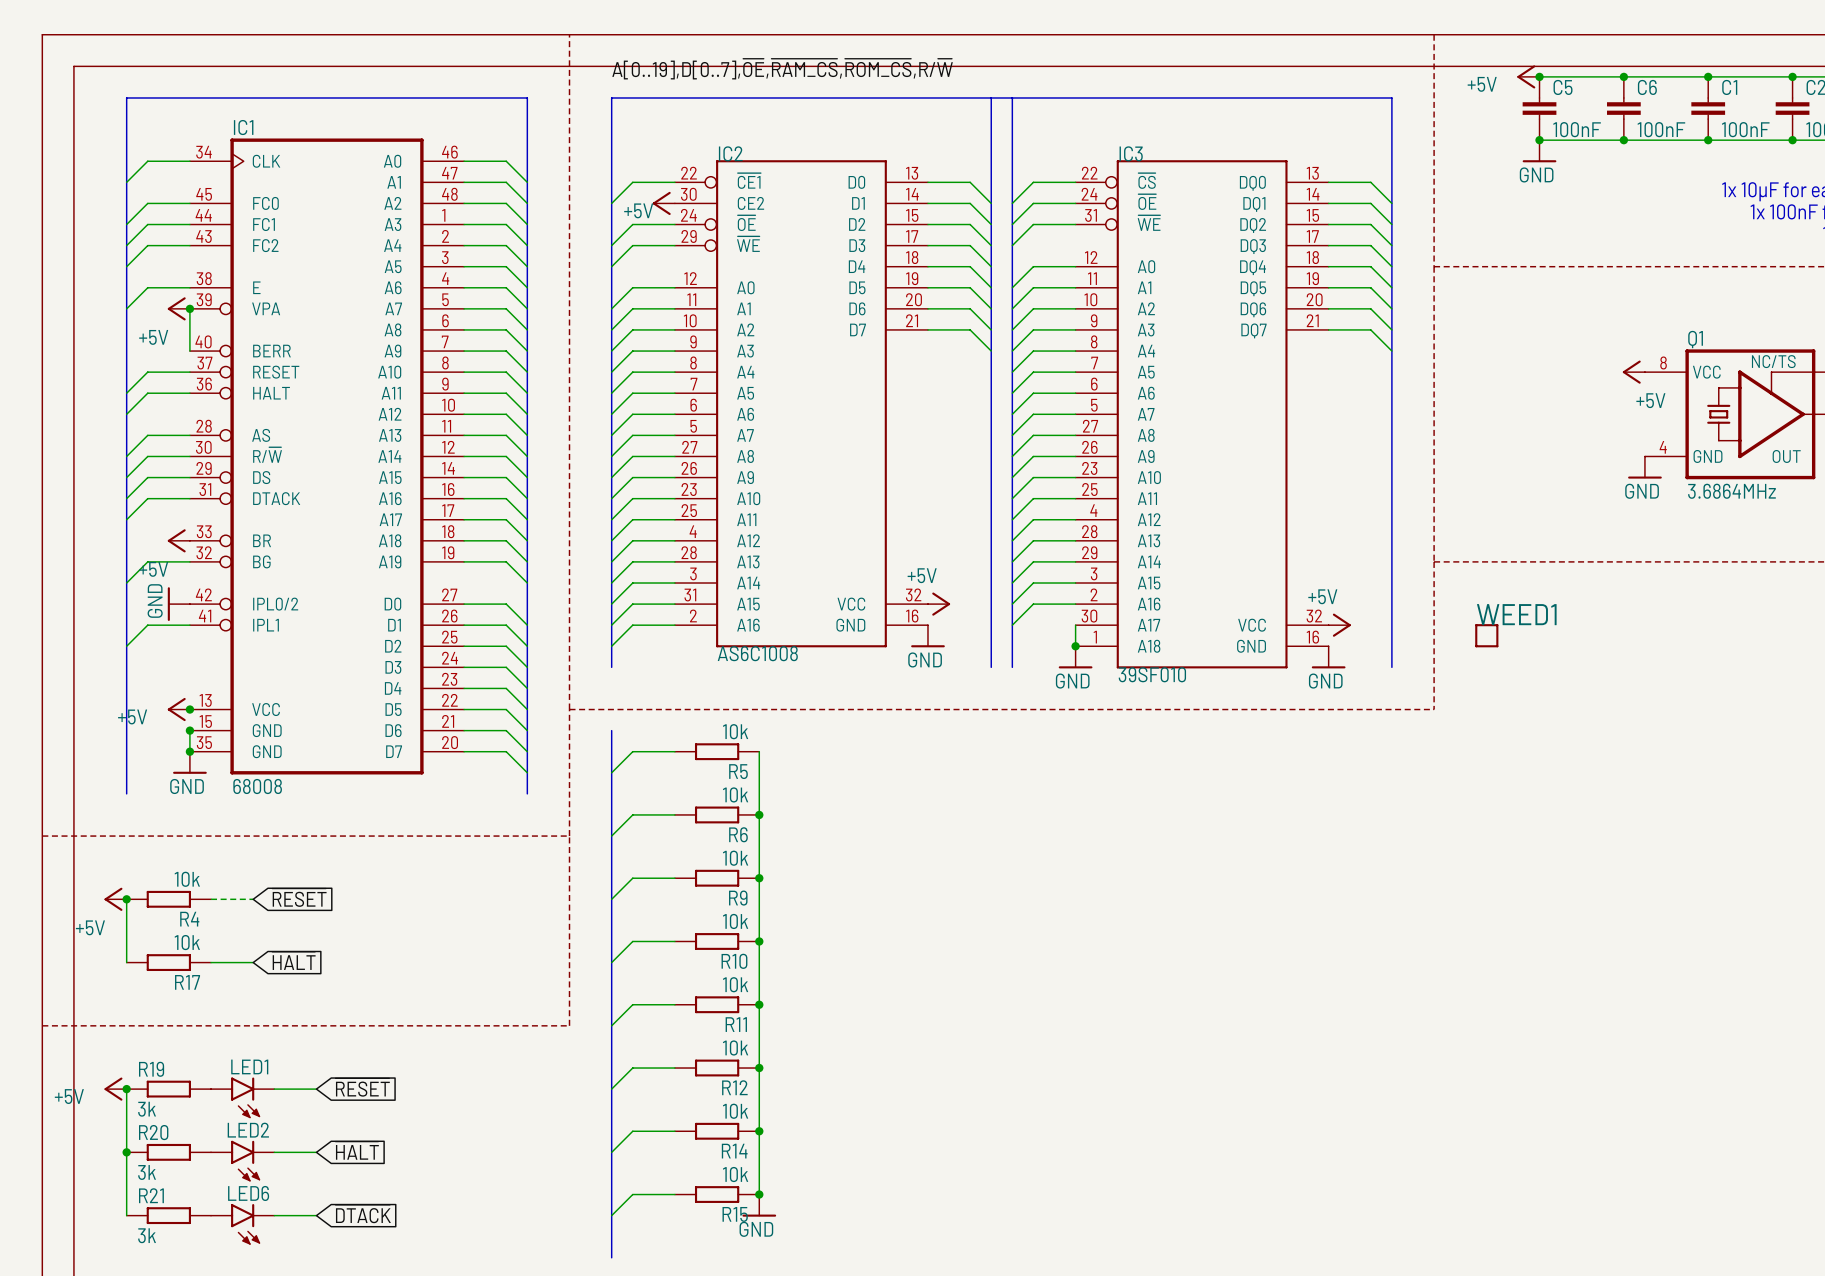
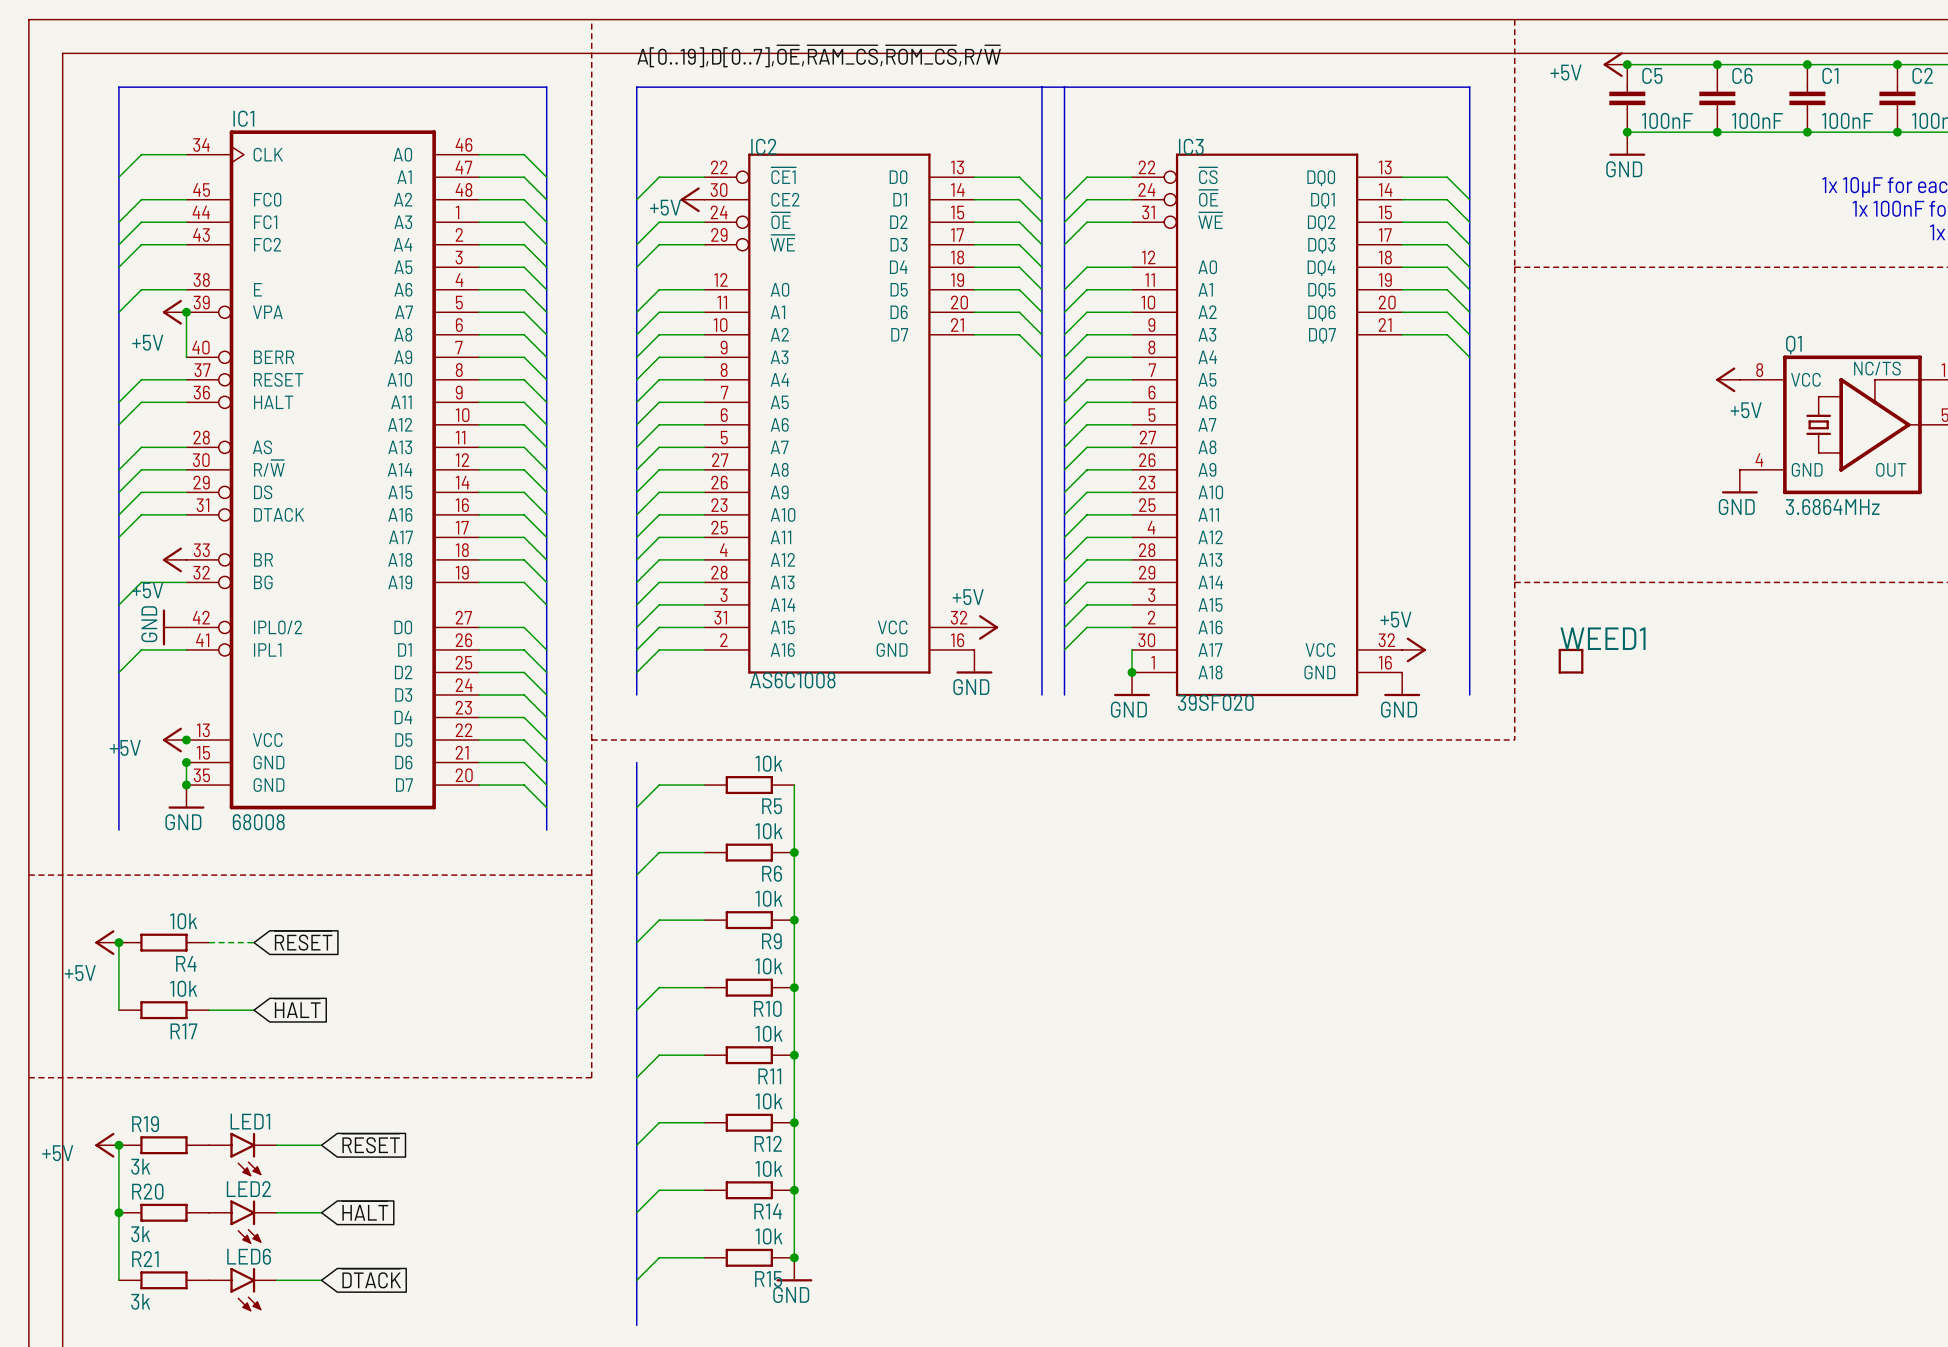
IC3 value: 39SF010 (1152, 674) -> 39SF020 (1215, 702)

